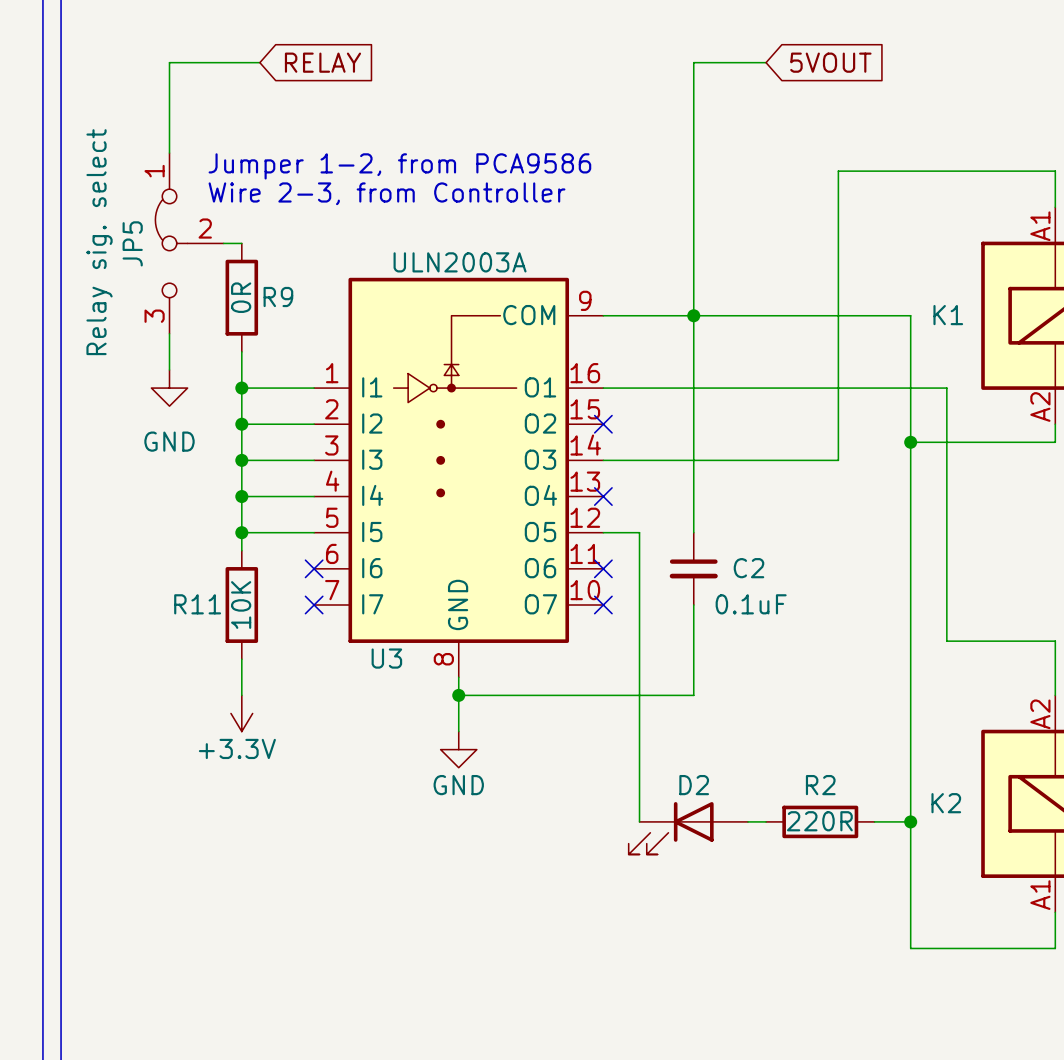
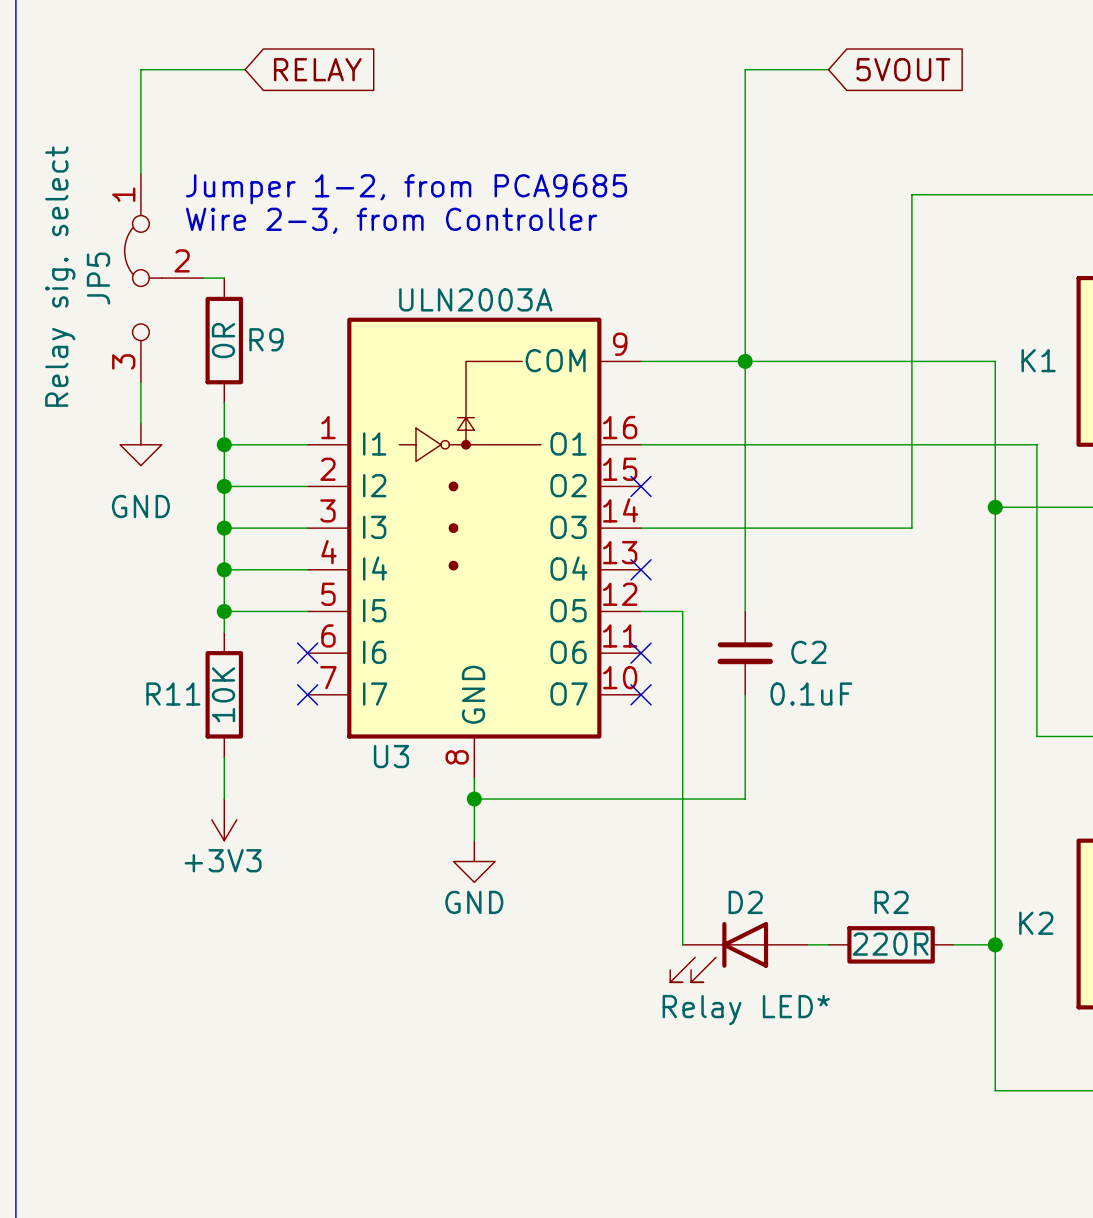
text: Jumper 1-2, from PCA9586 (399, 166) -> Jumper 1-2, from PCA9685 (406, 189)
power symbol: +3.3V (241, 713) -> +3V3 (224, 819)
D2 value: none -> Relay LED* (746, 1010)

